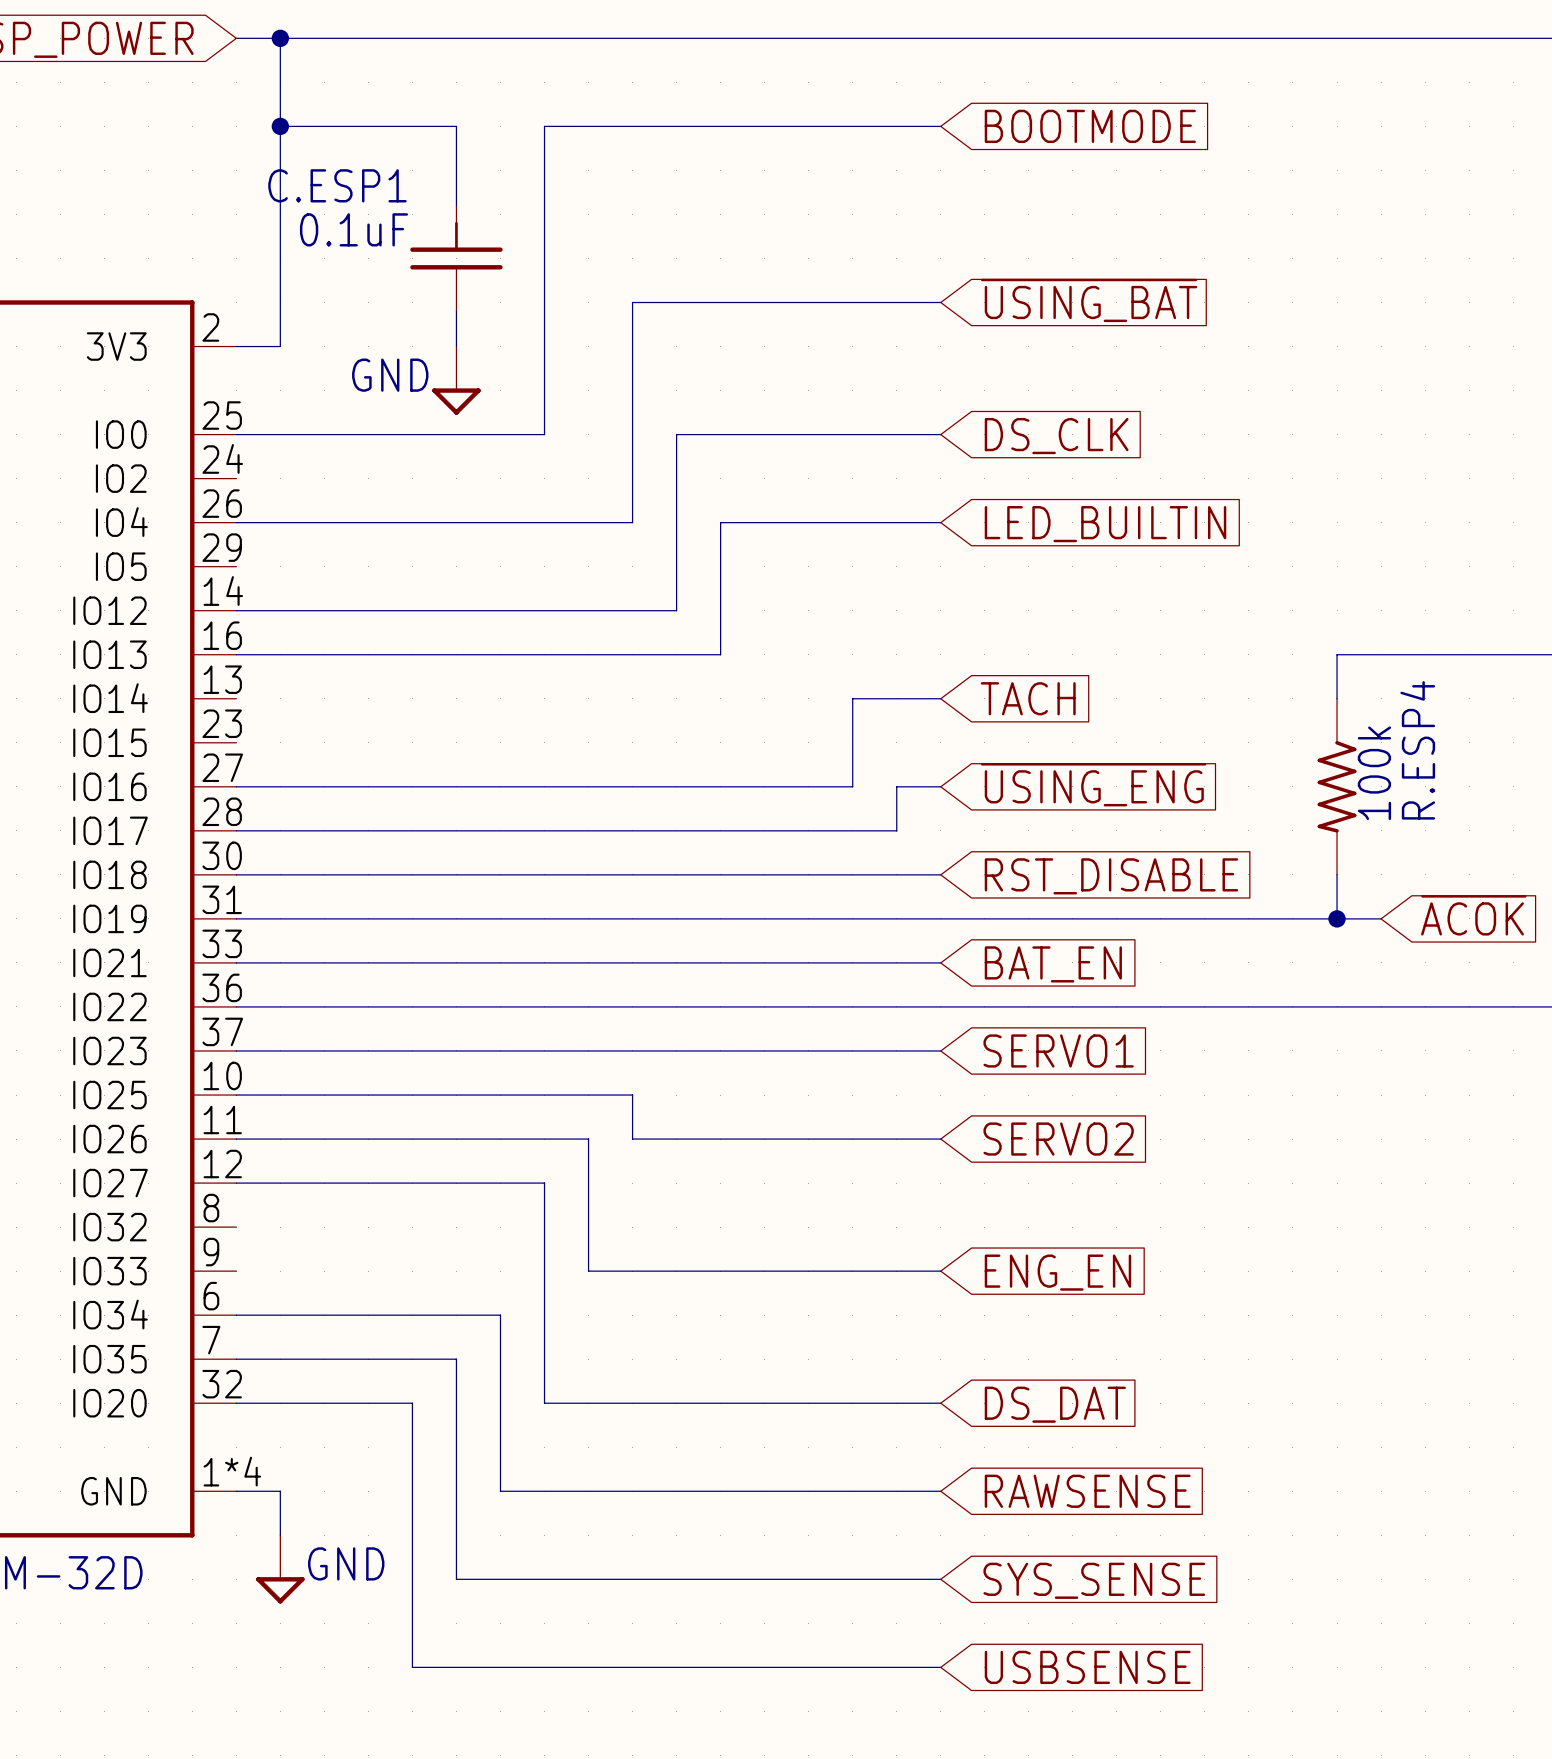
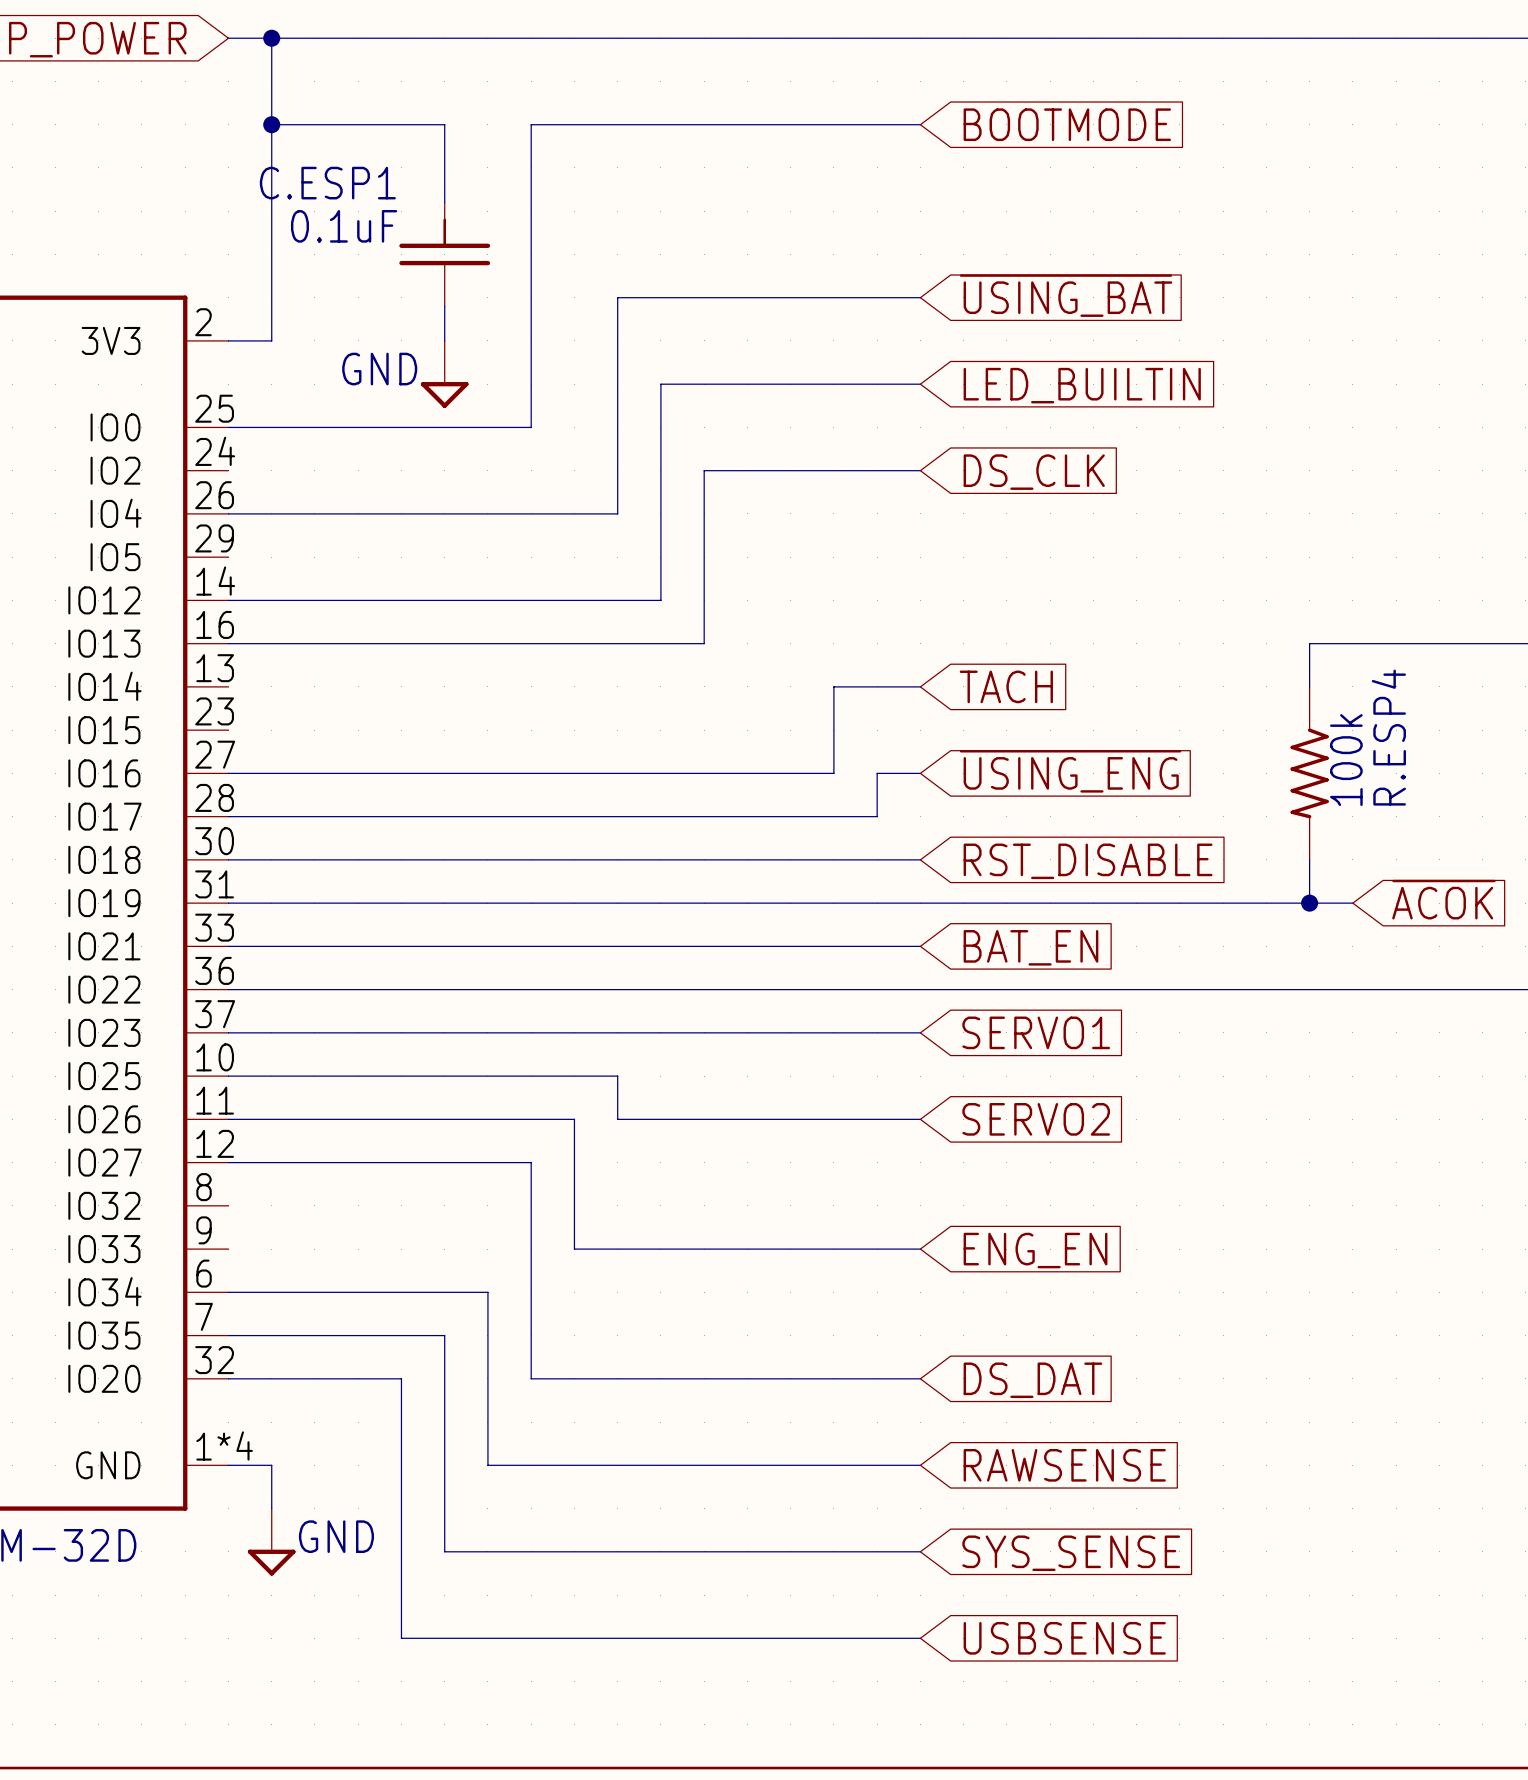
wire: (676, 434) (940, 434) -> (660, 427) (660, 384) (920, 384)
global label position: DS_CLK (1056, 436) -> DS_CLK (1034, 472)
wire: (720, 522) (940, 522) -> (704, 513) (704, 470) (920, 470)
global label position: LED_BUILTIN (1105, 524) -> LED_BUILTIN (1082, 385)

